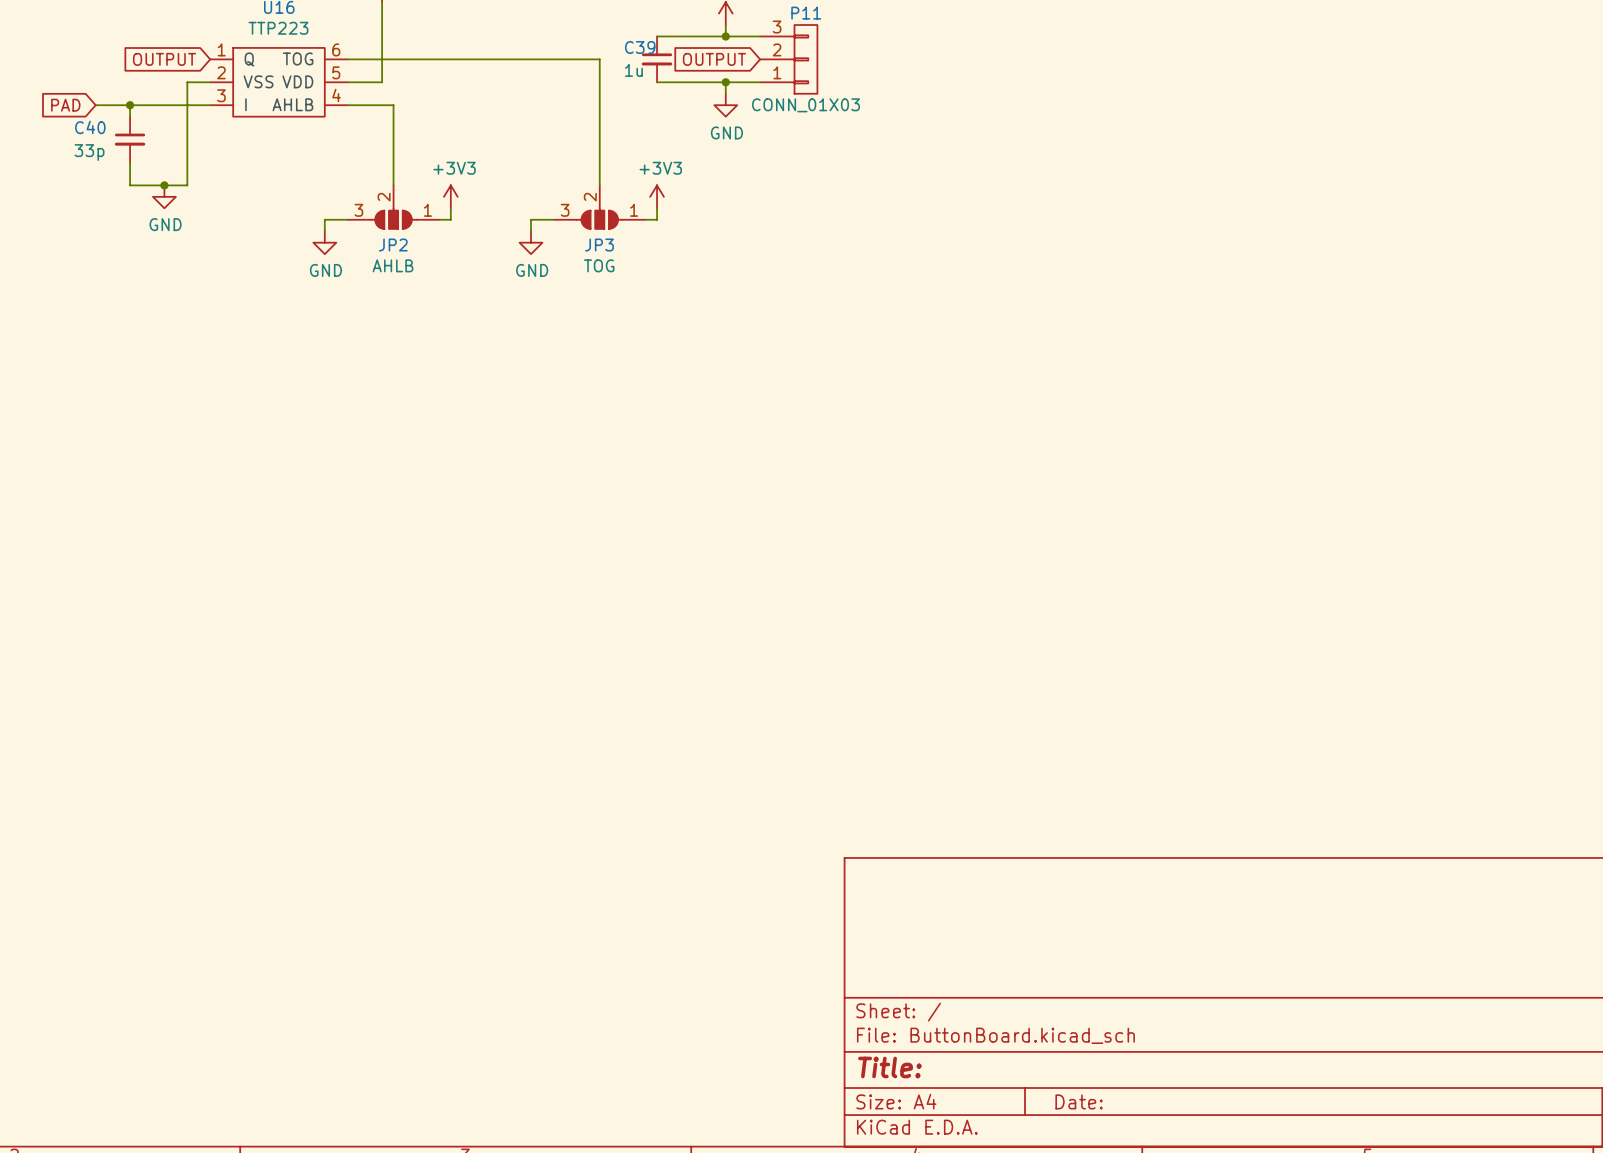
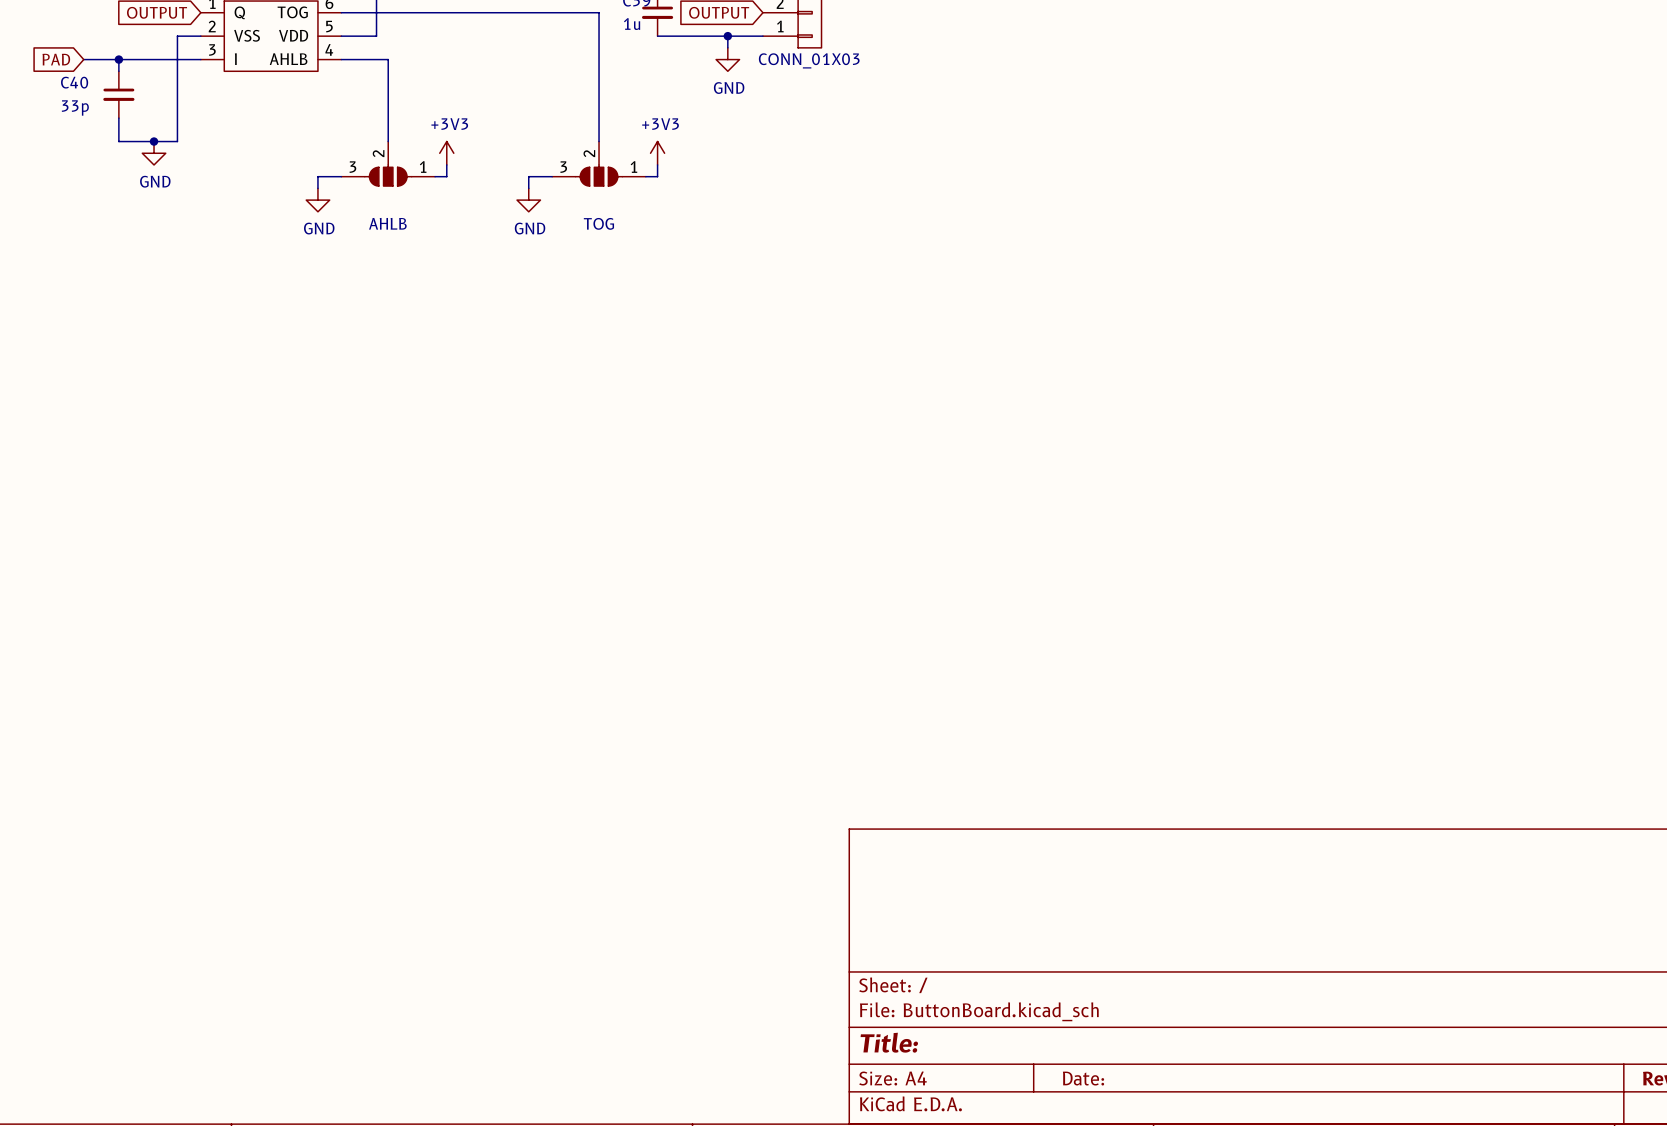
JP2: AHLB (393, 207) -> none
JP3: TOG (599, 207) -> none

